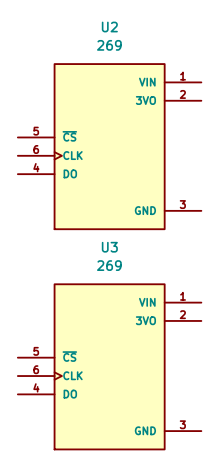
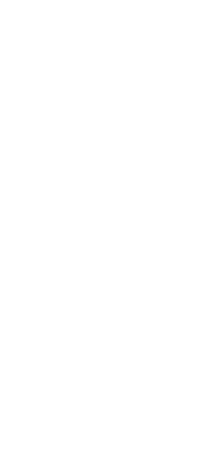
U2: 269 (109, 146) -> none
U3: 269 (109, 366) -> none

